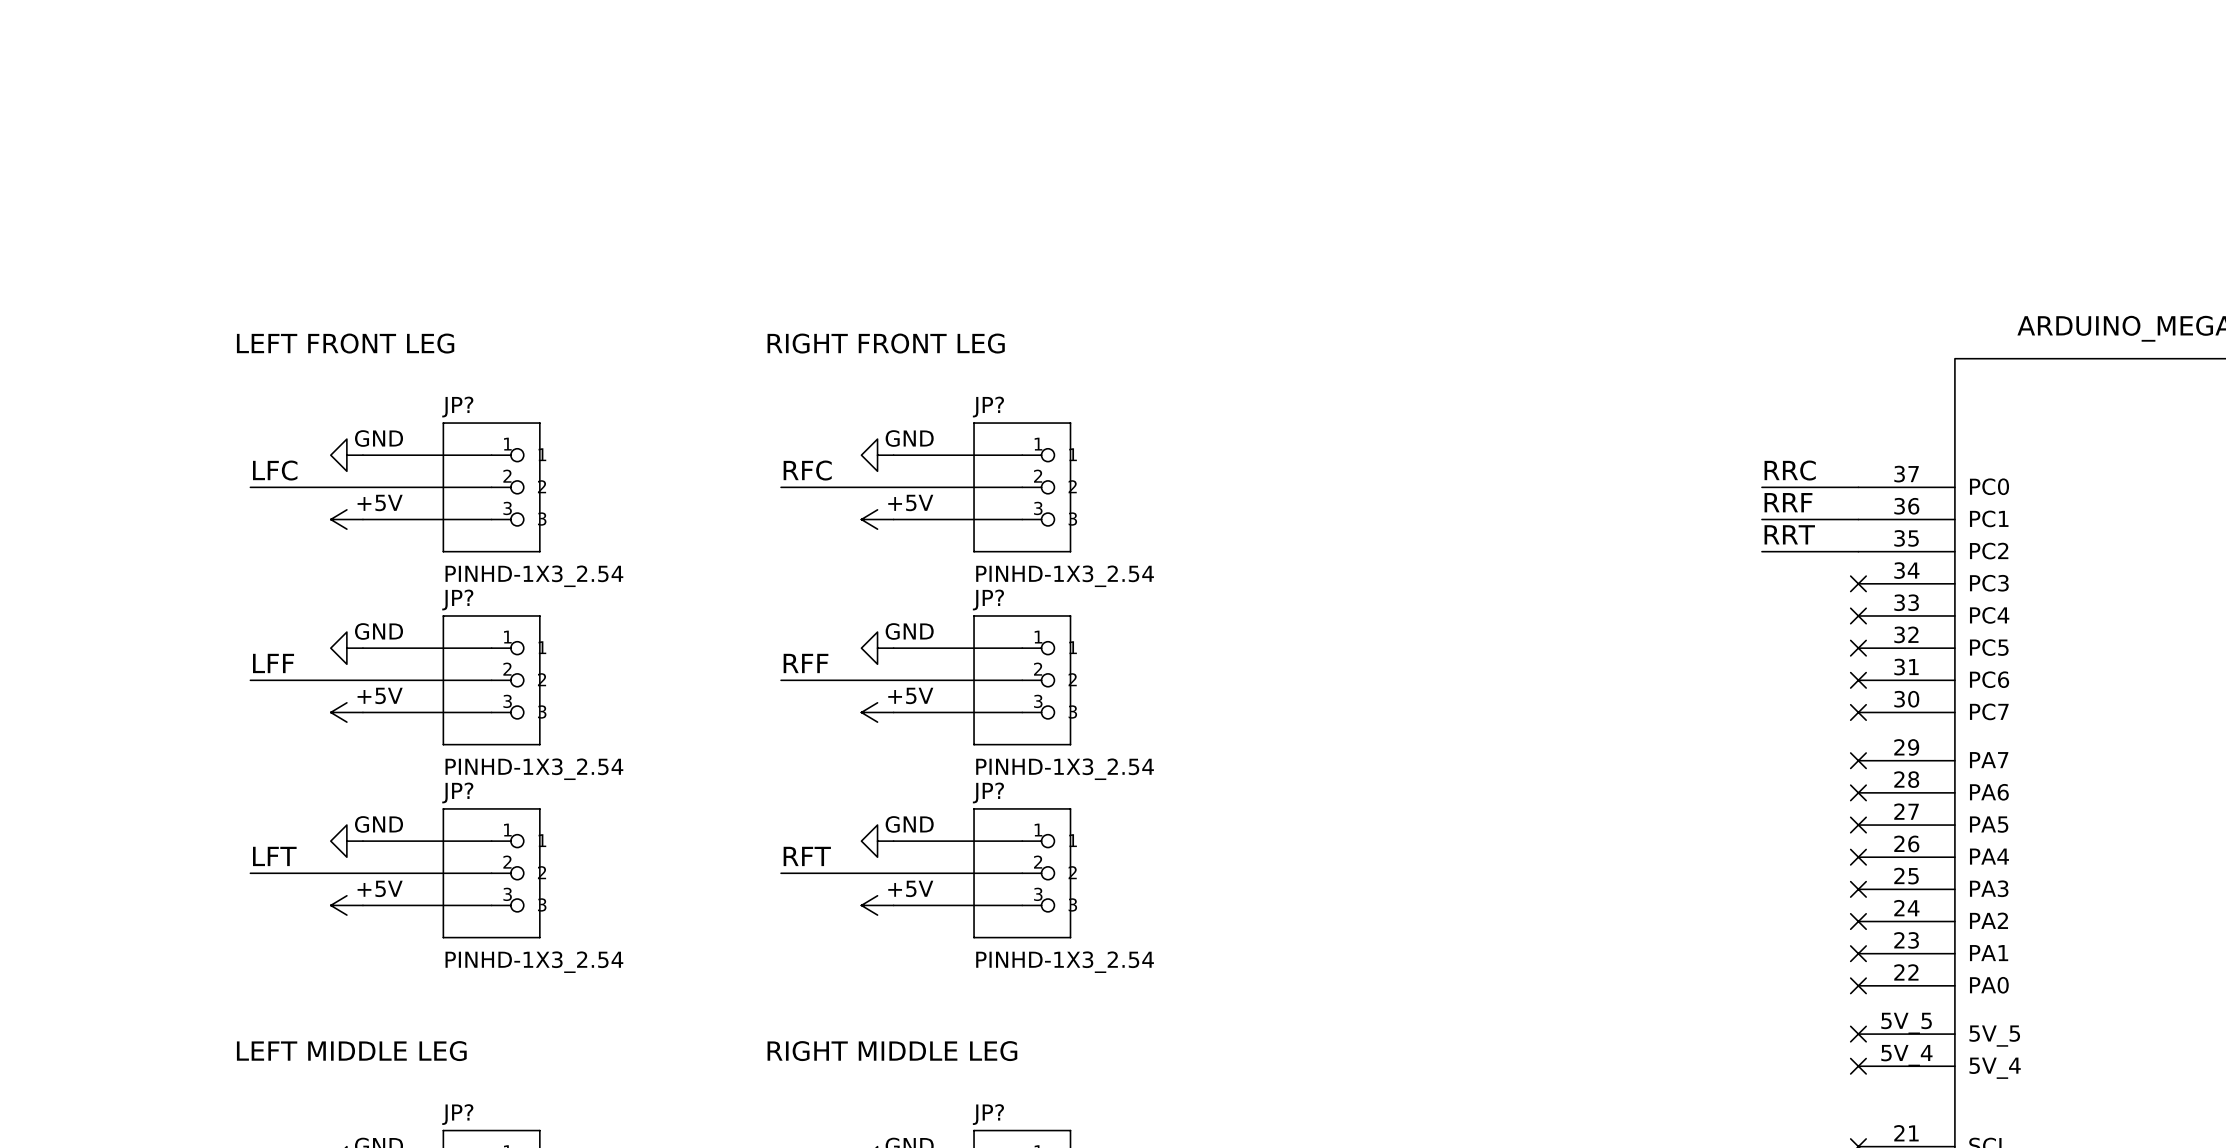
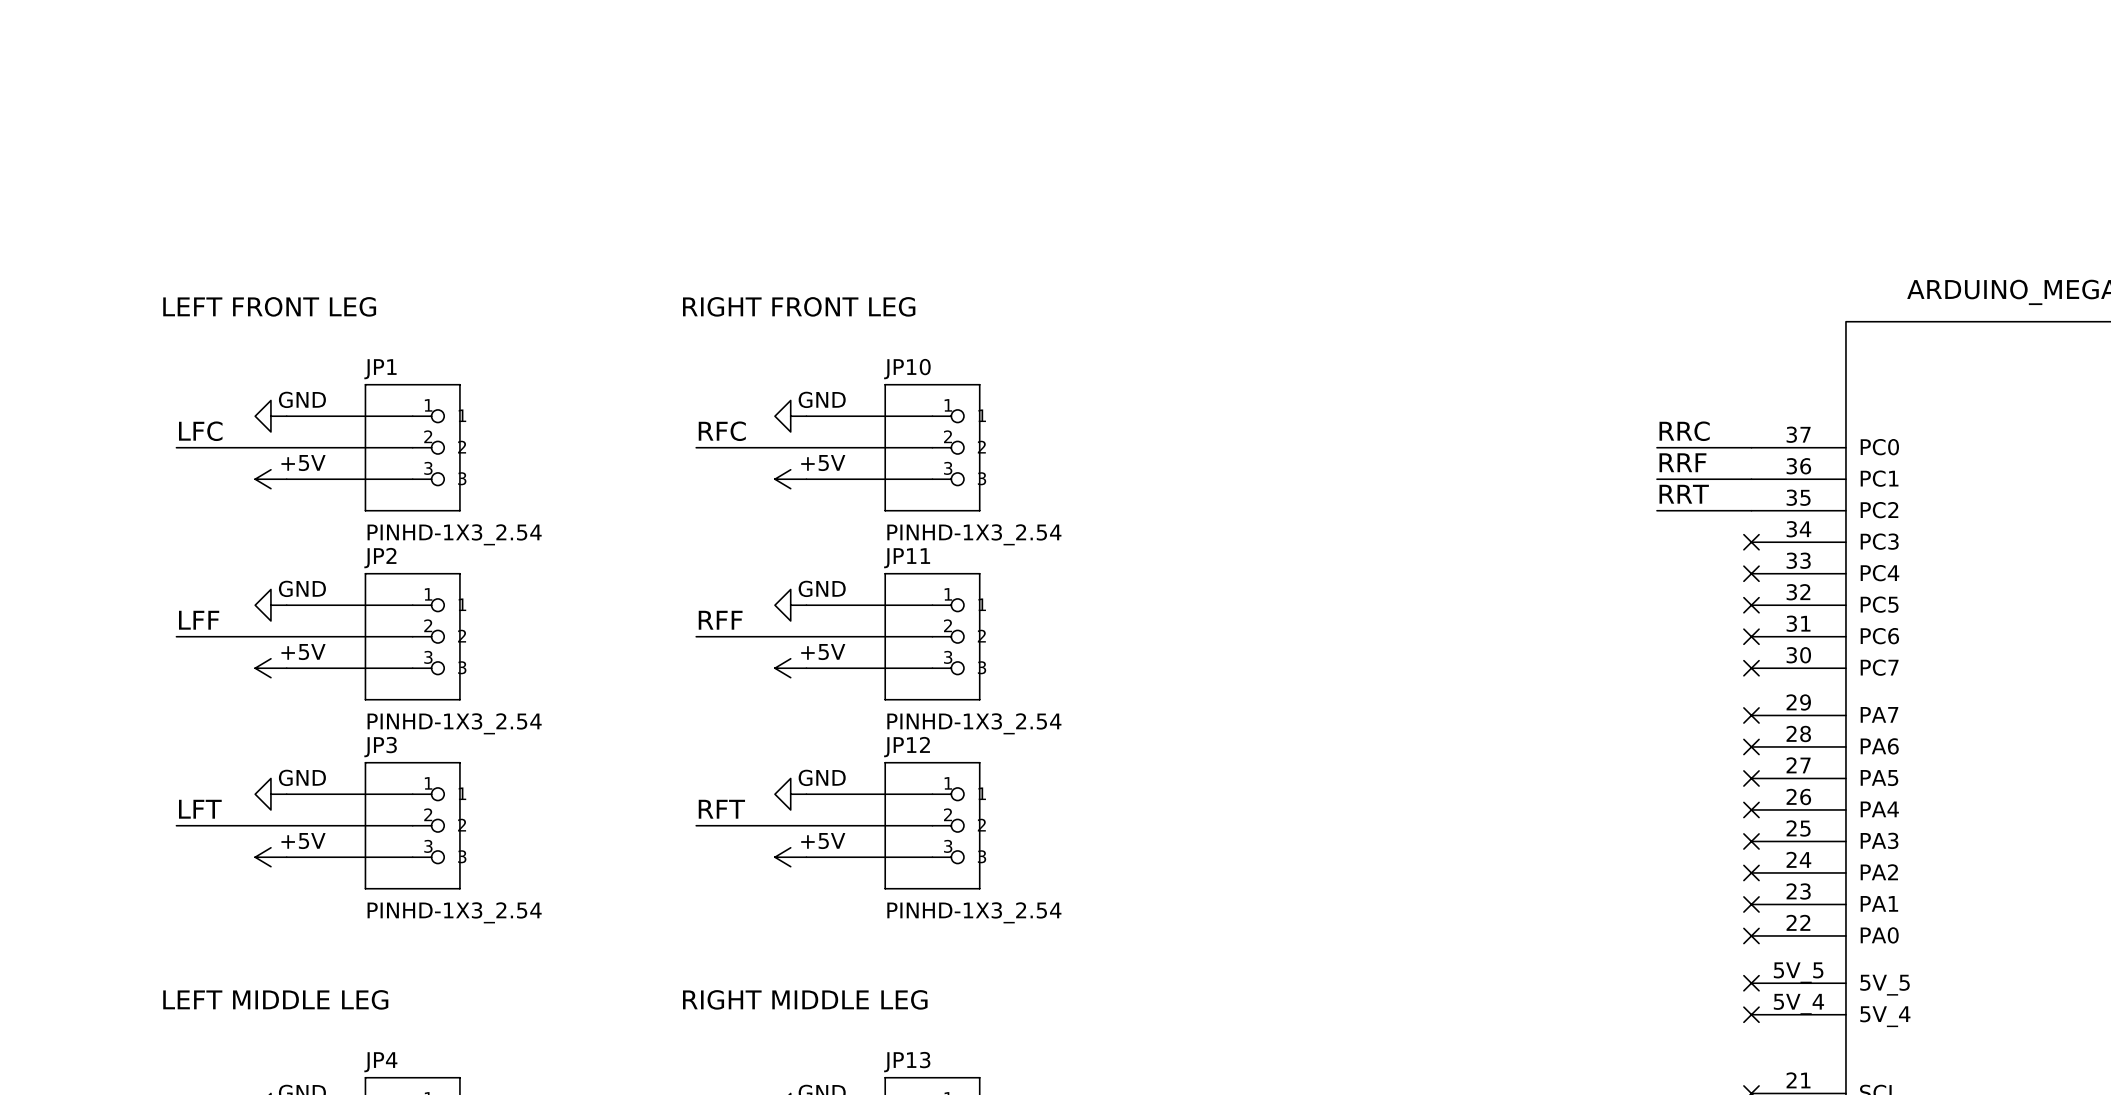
JP? name: JP? (457, 407) -> JP1 (380, 369)
JP? name: JP? (988, 407) -> JP10 (907, 369)
JP? name: JP? (457, 600) -> JP2 (380, 558)
JP? name: JP? (988, 600) -> JP11 (907, 558)
JP? name: JP? (457, 792) -> JP3 (380, 747)
JP? name: JP? (988, 792) -> JP12 (907, 747)
JP? name: JP? (457, 1114) -> JP4 (380, 1062)
JP? name: JP? (988, 1114) -> JP13 (907, 1062)

